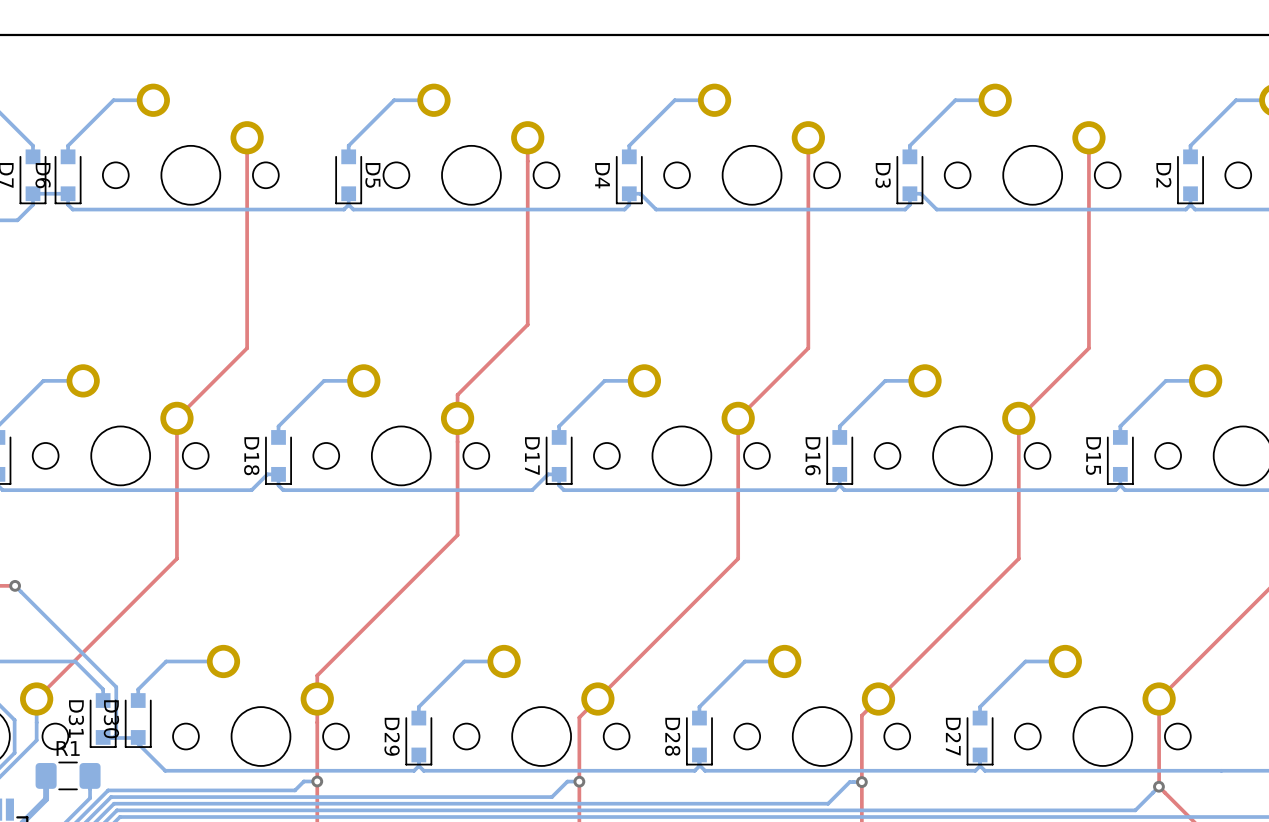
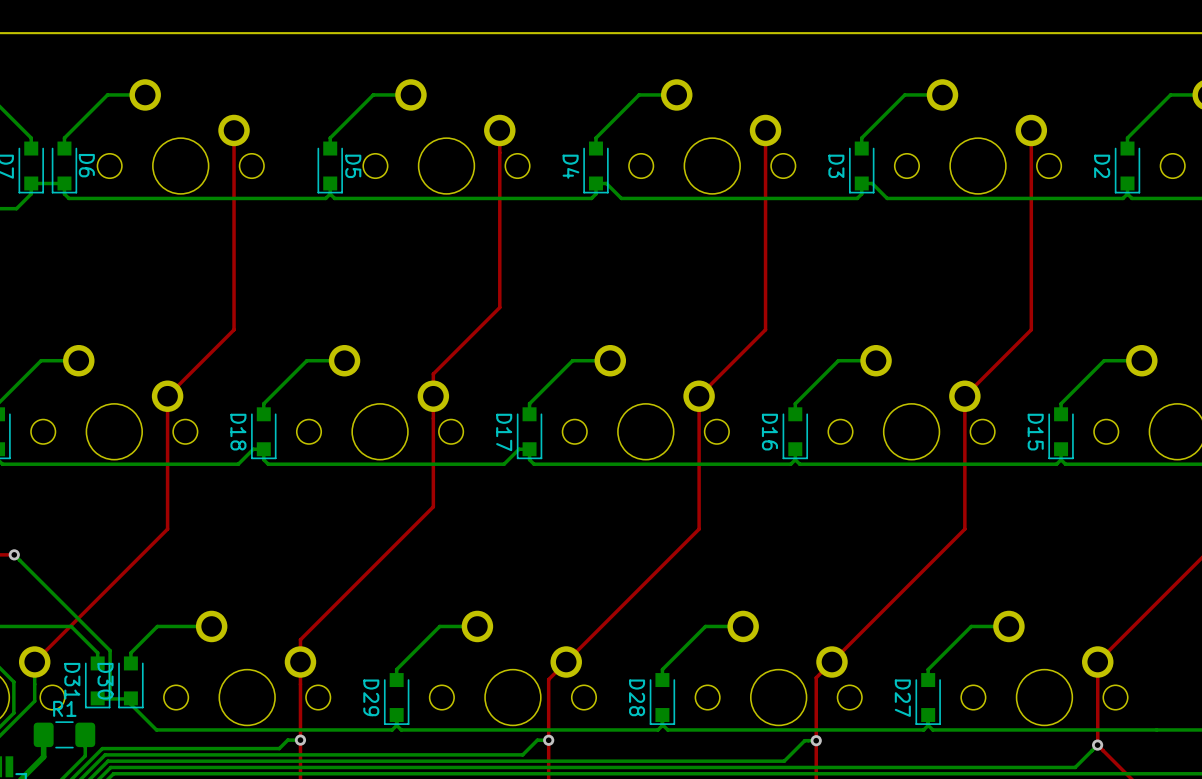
D6 name position: D6 (43, 175) -> D6 (86, 165)

